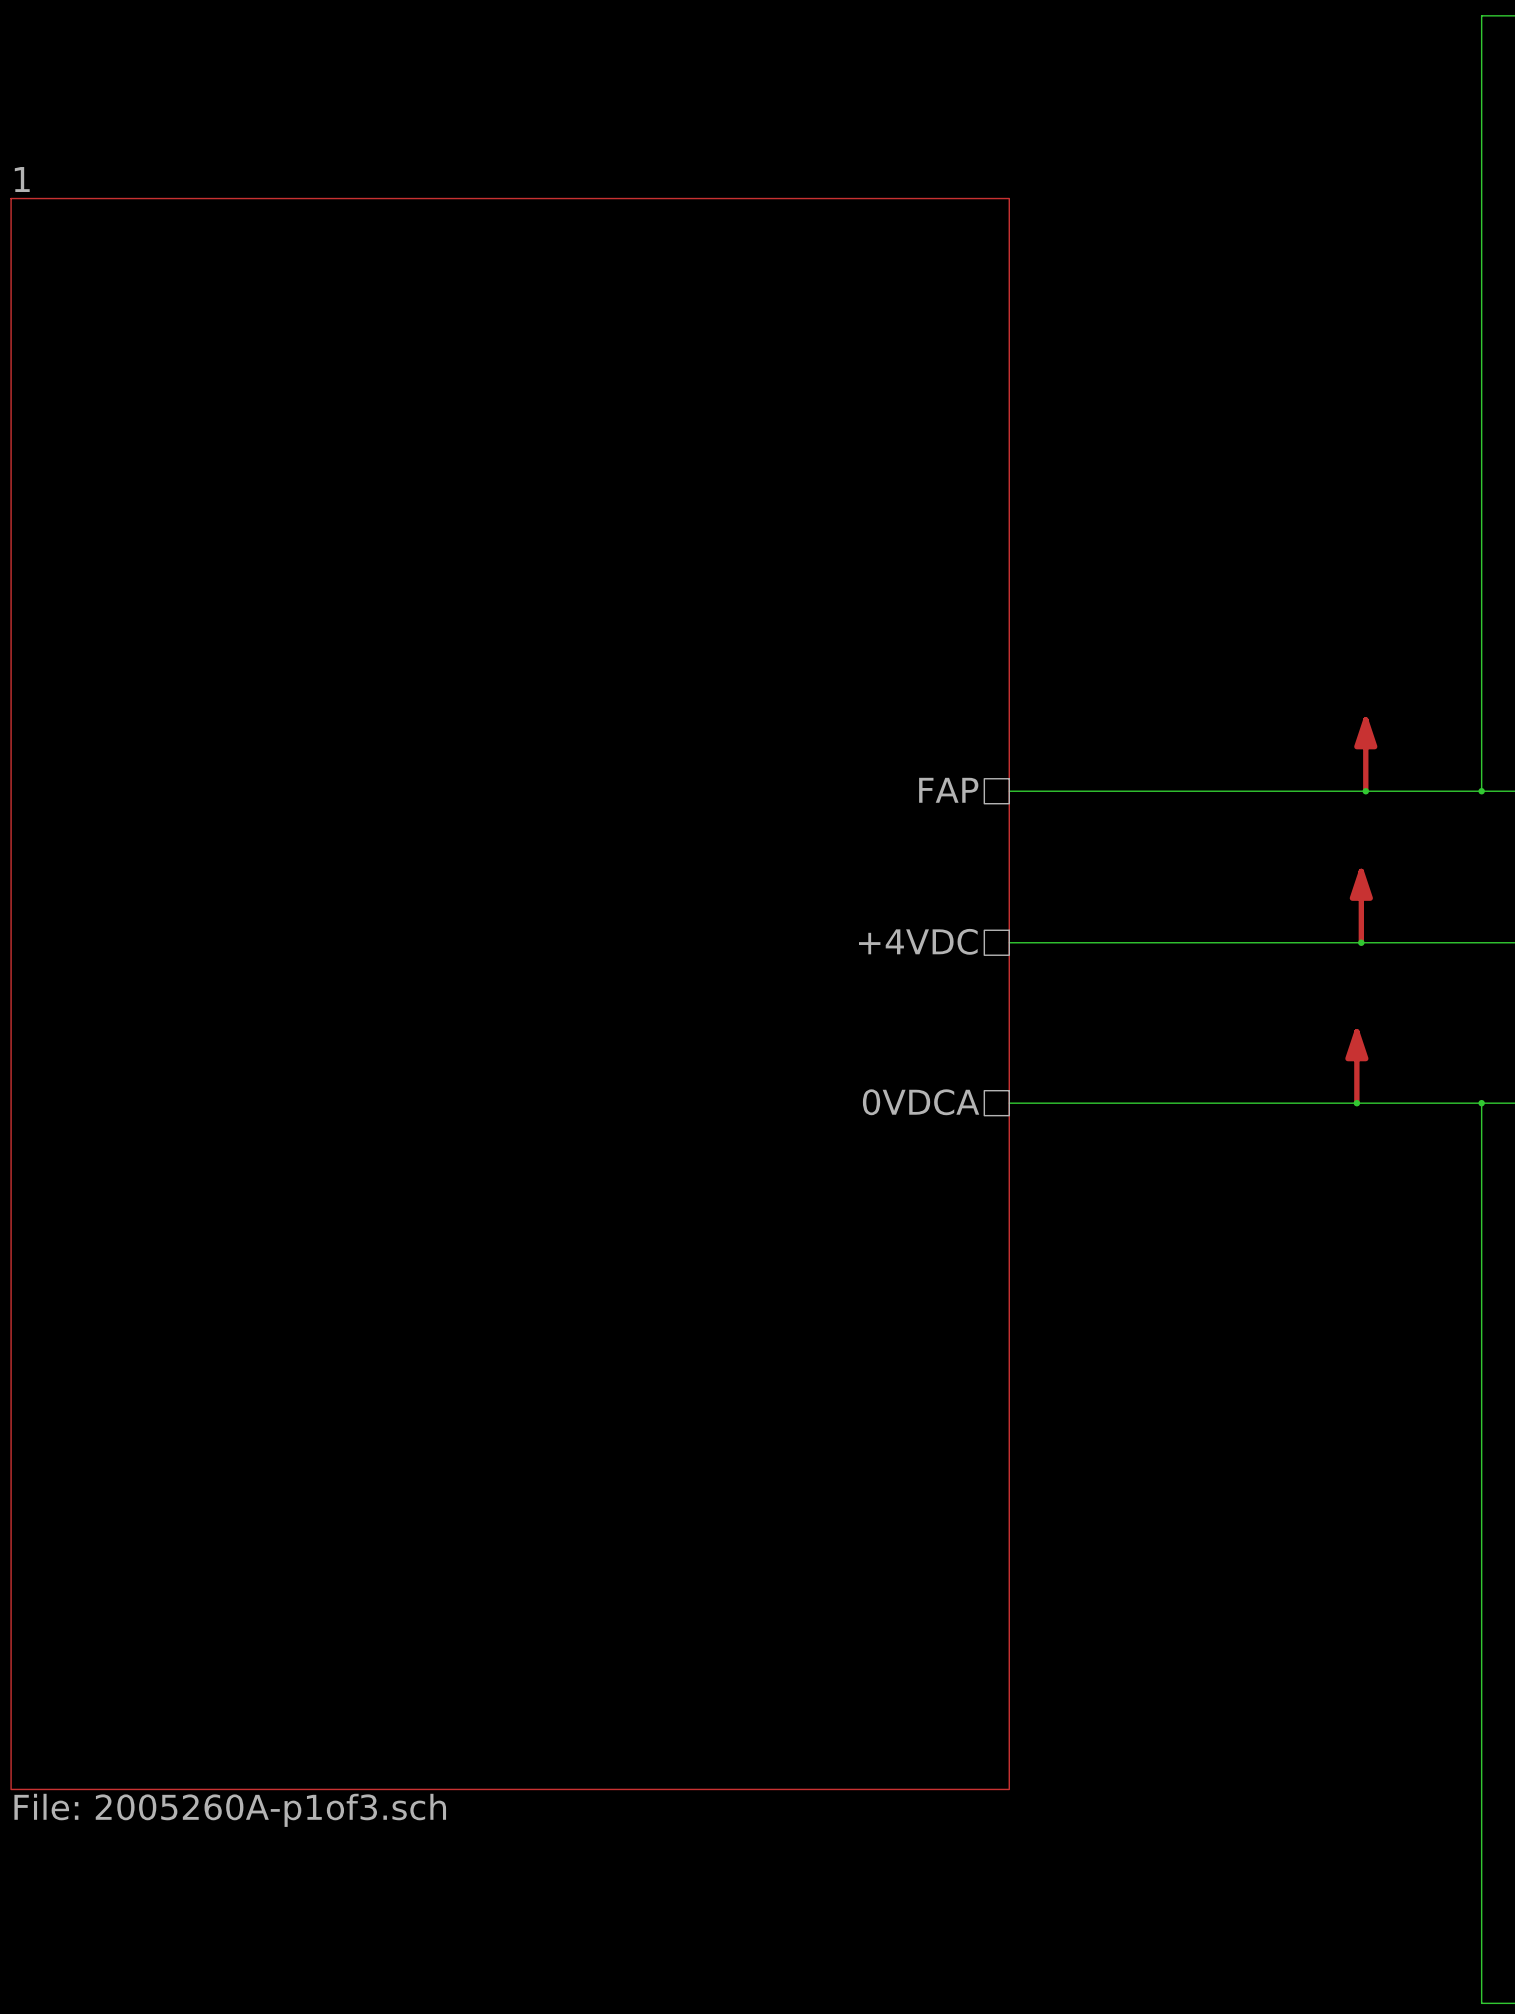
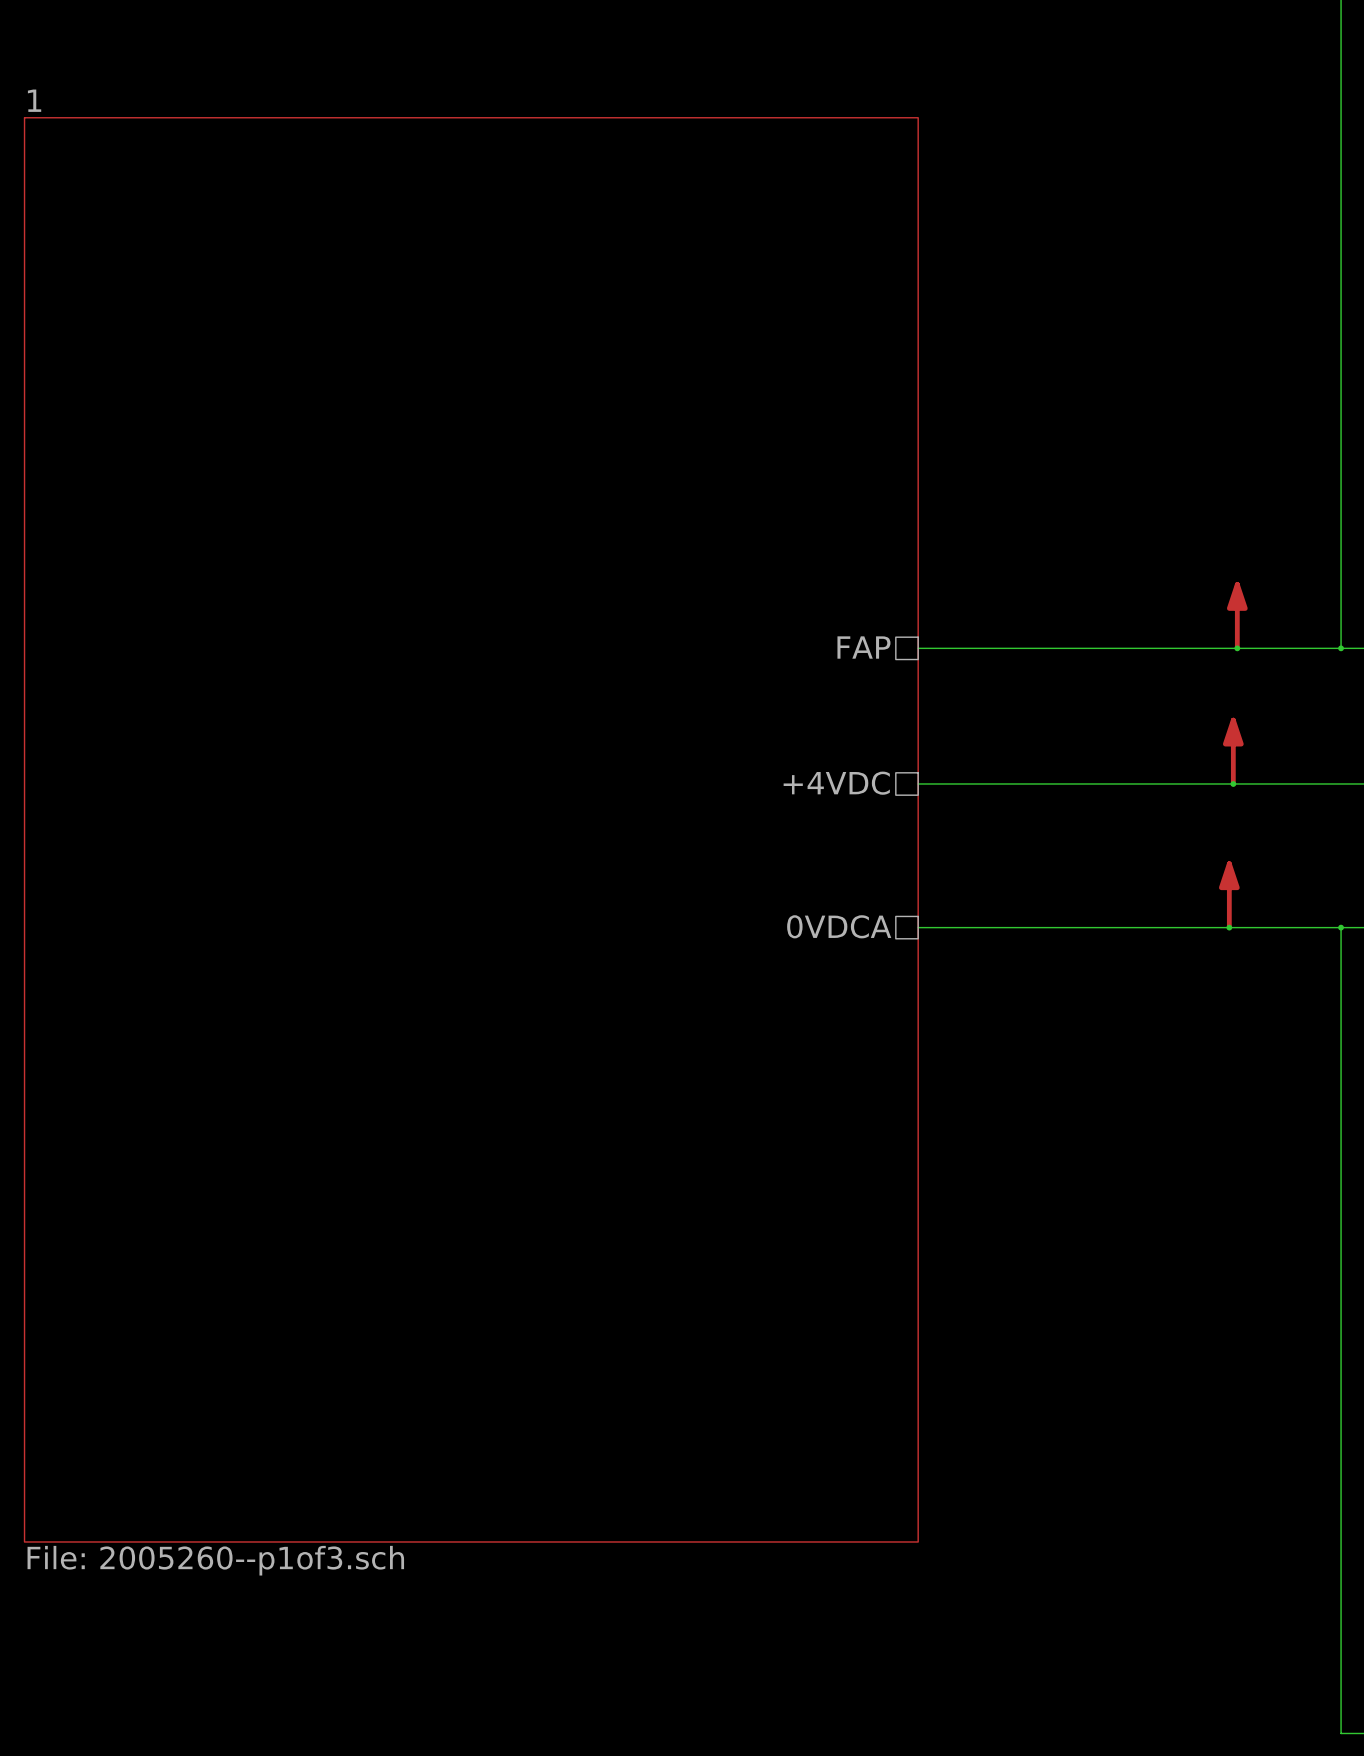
sheet 1 value: File: 2005260A-p1of3.sch (230, 1810) -> File: 2005260--p1of3.sch (215, 1560)

